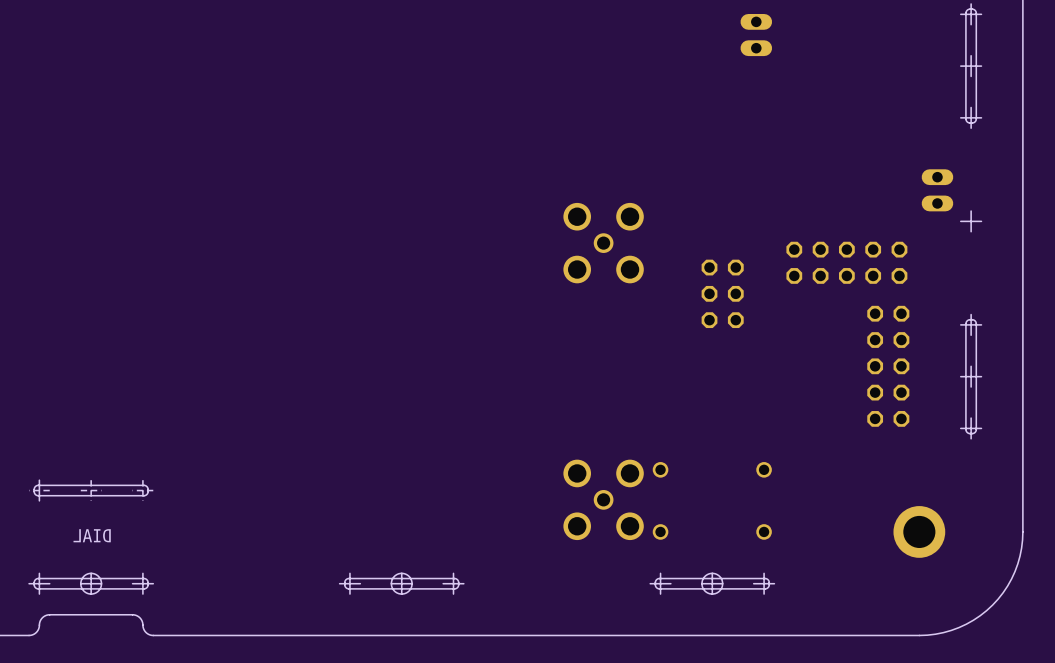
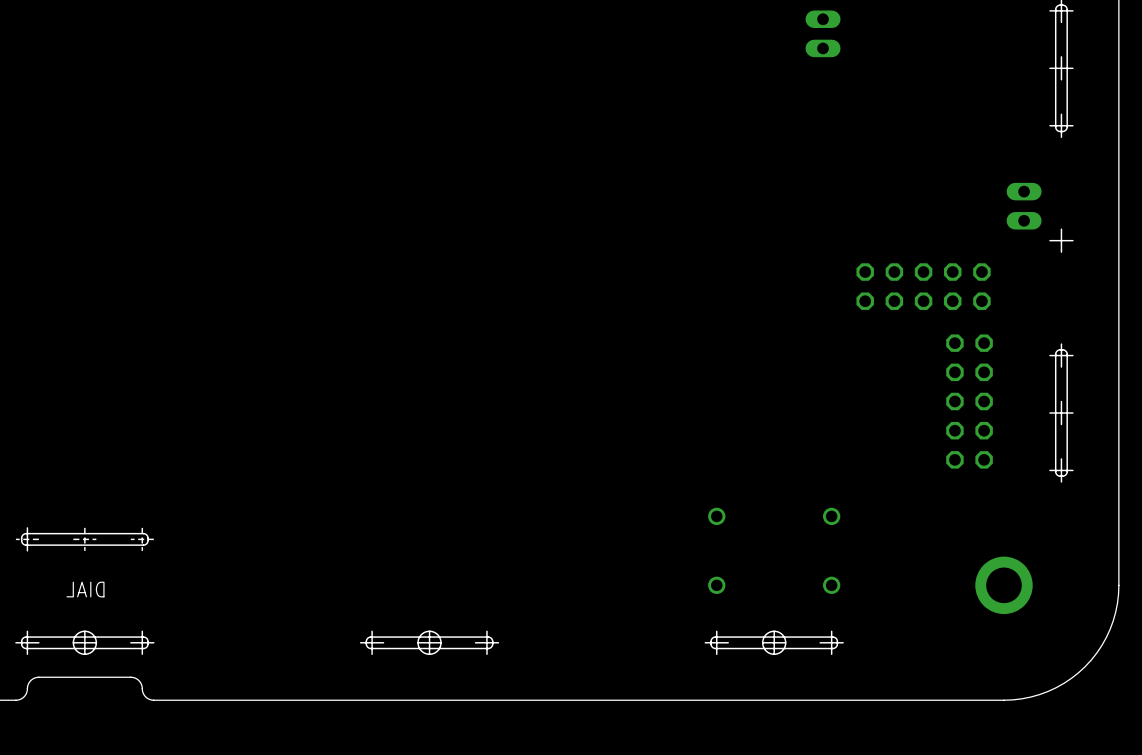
part: (603, 243) -> none
part: (722, 293) -> none
part: (603, 499) -> none

